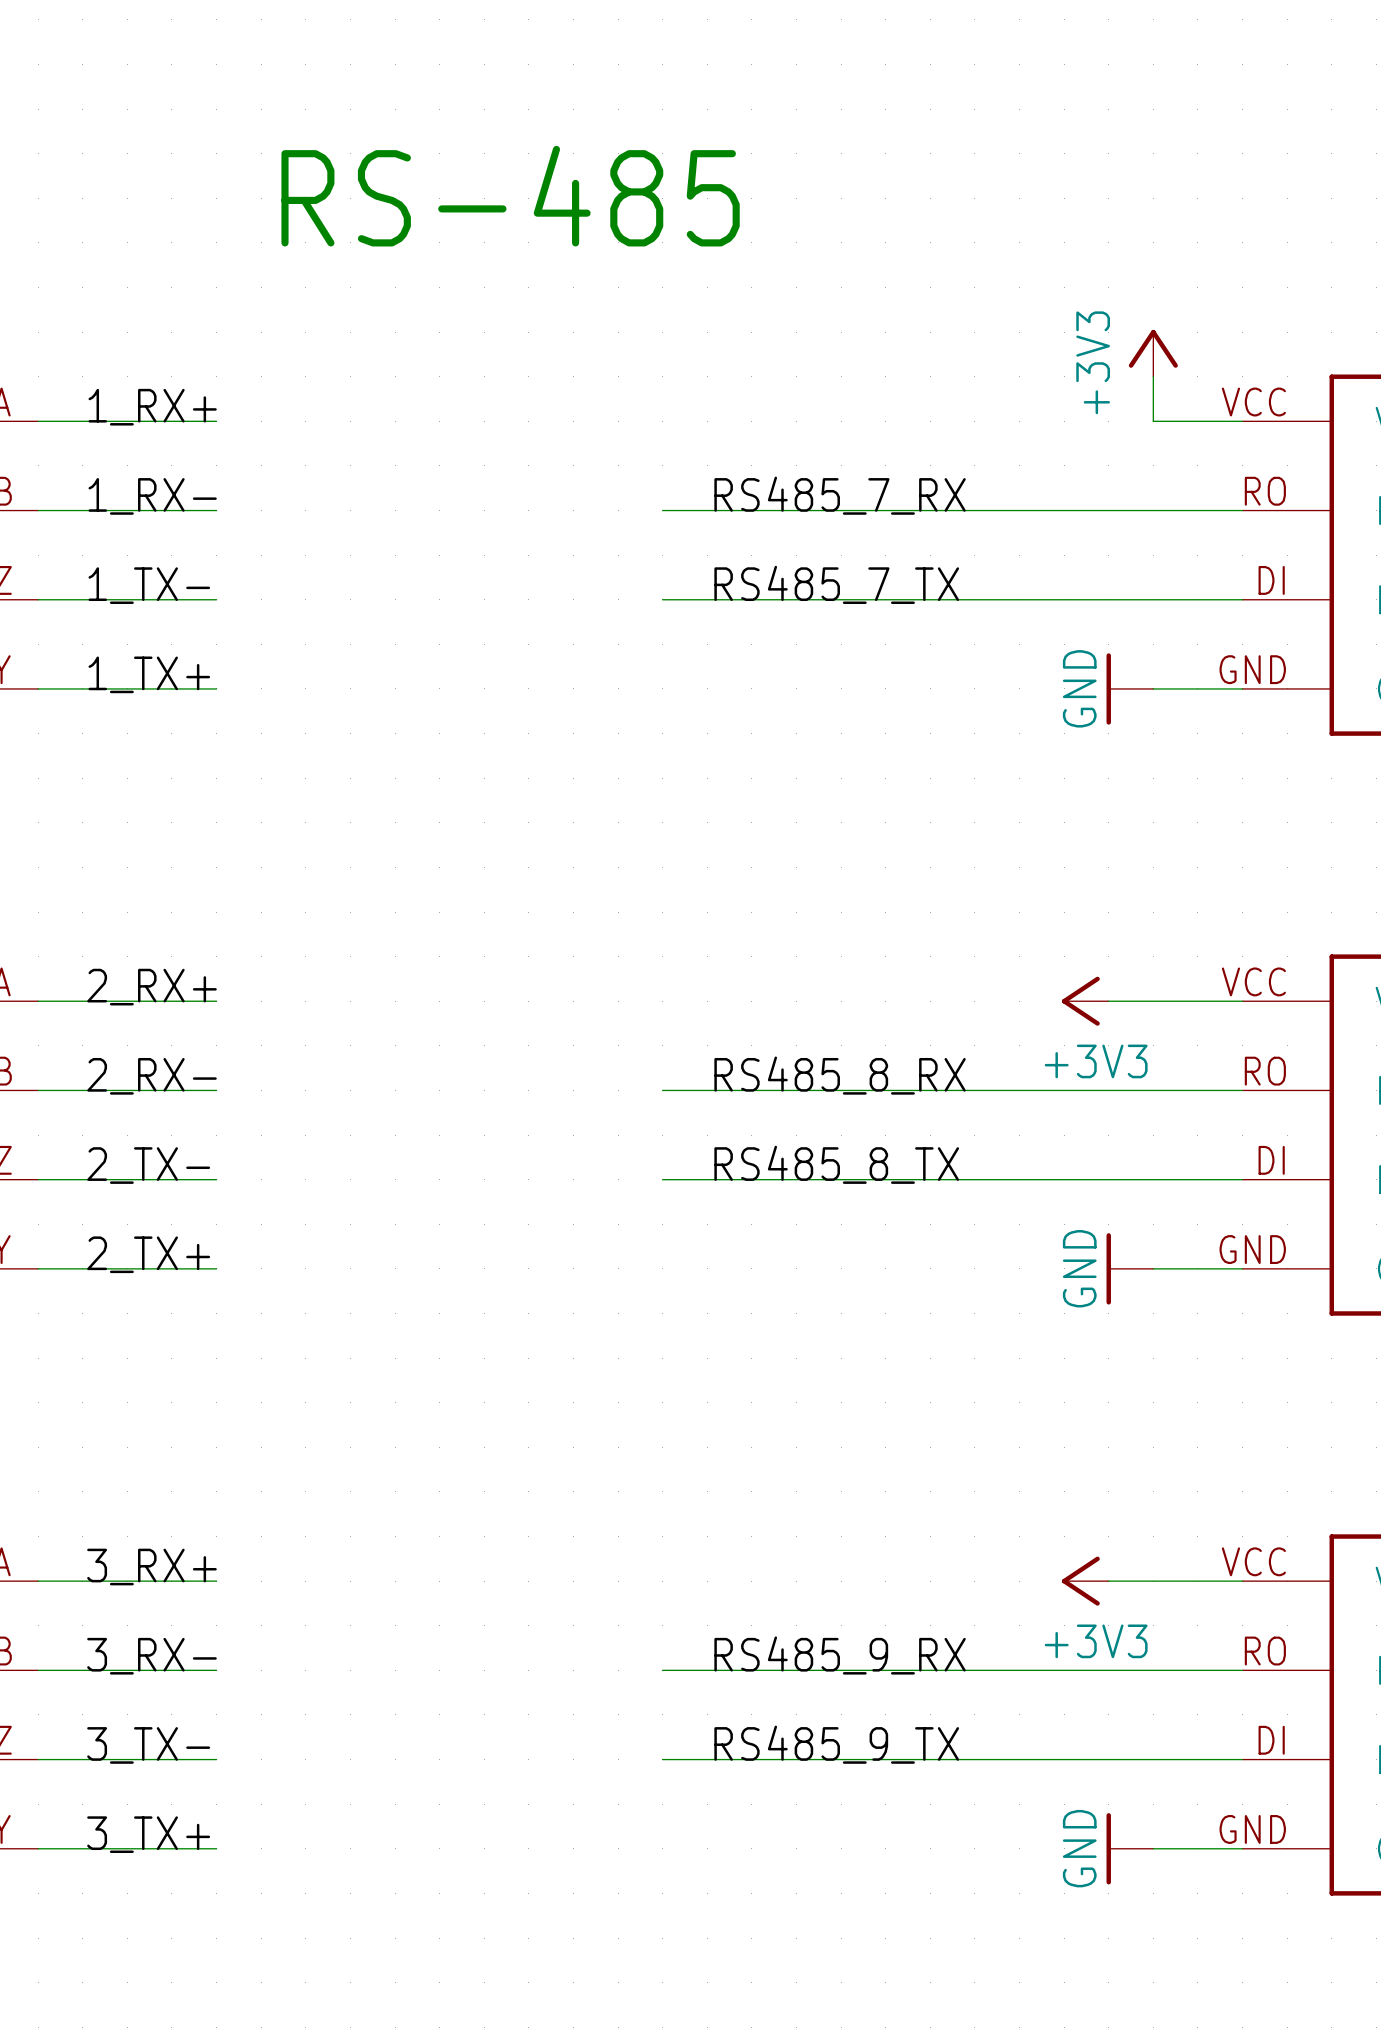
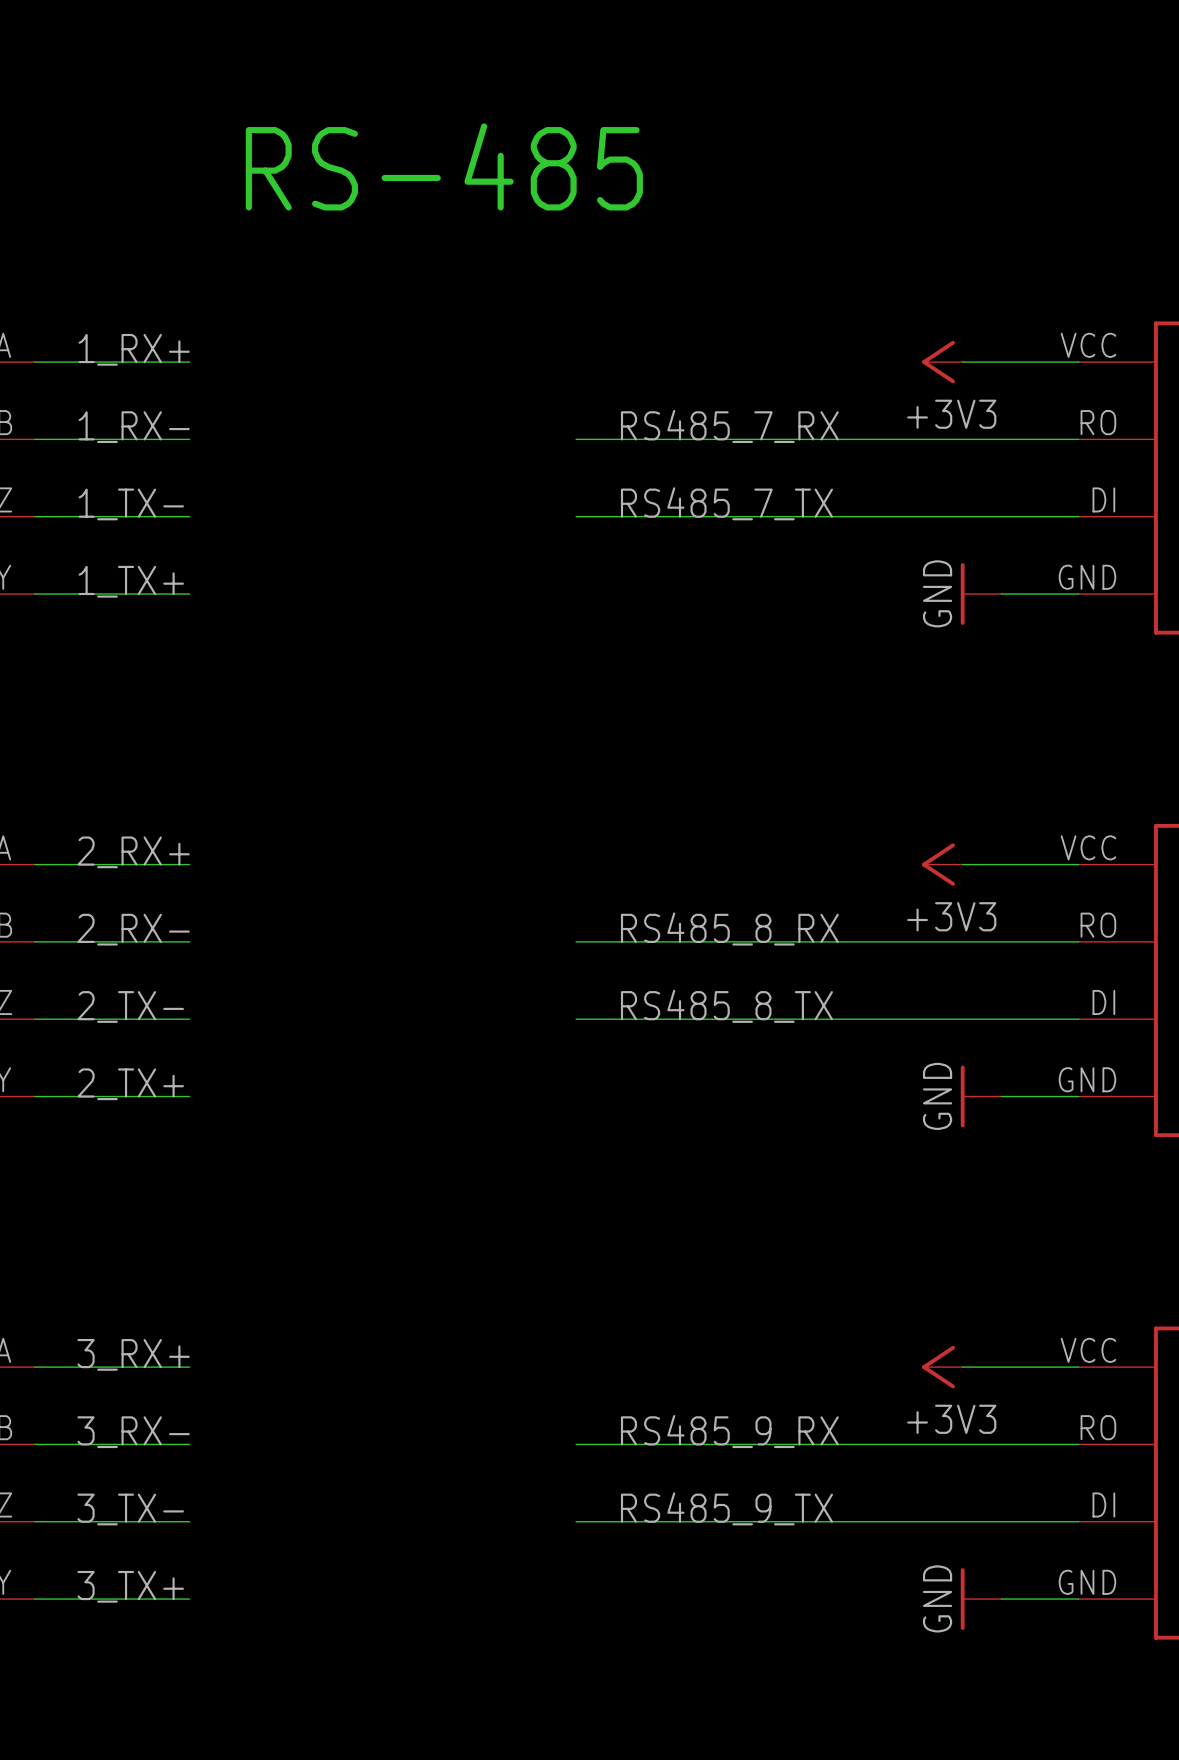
power symbol rotation: 0° (1153, 348) -> 90° counterclockwise (938, 362)
power symbol position: +3V3 (1153, 353) -> +3V3 (942, 362)
wire: (1153, 376) (1153, 421) -> (962, 362) (1001, 362)

